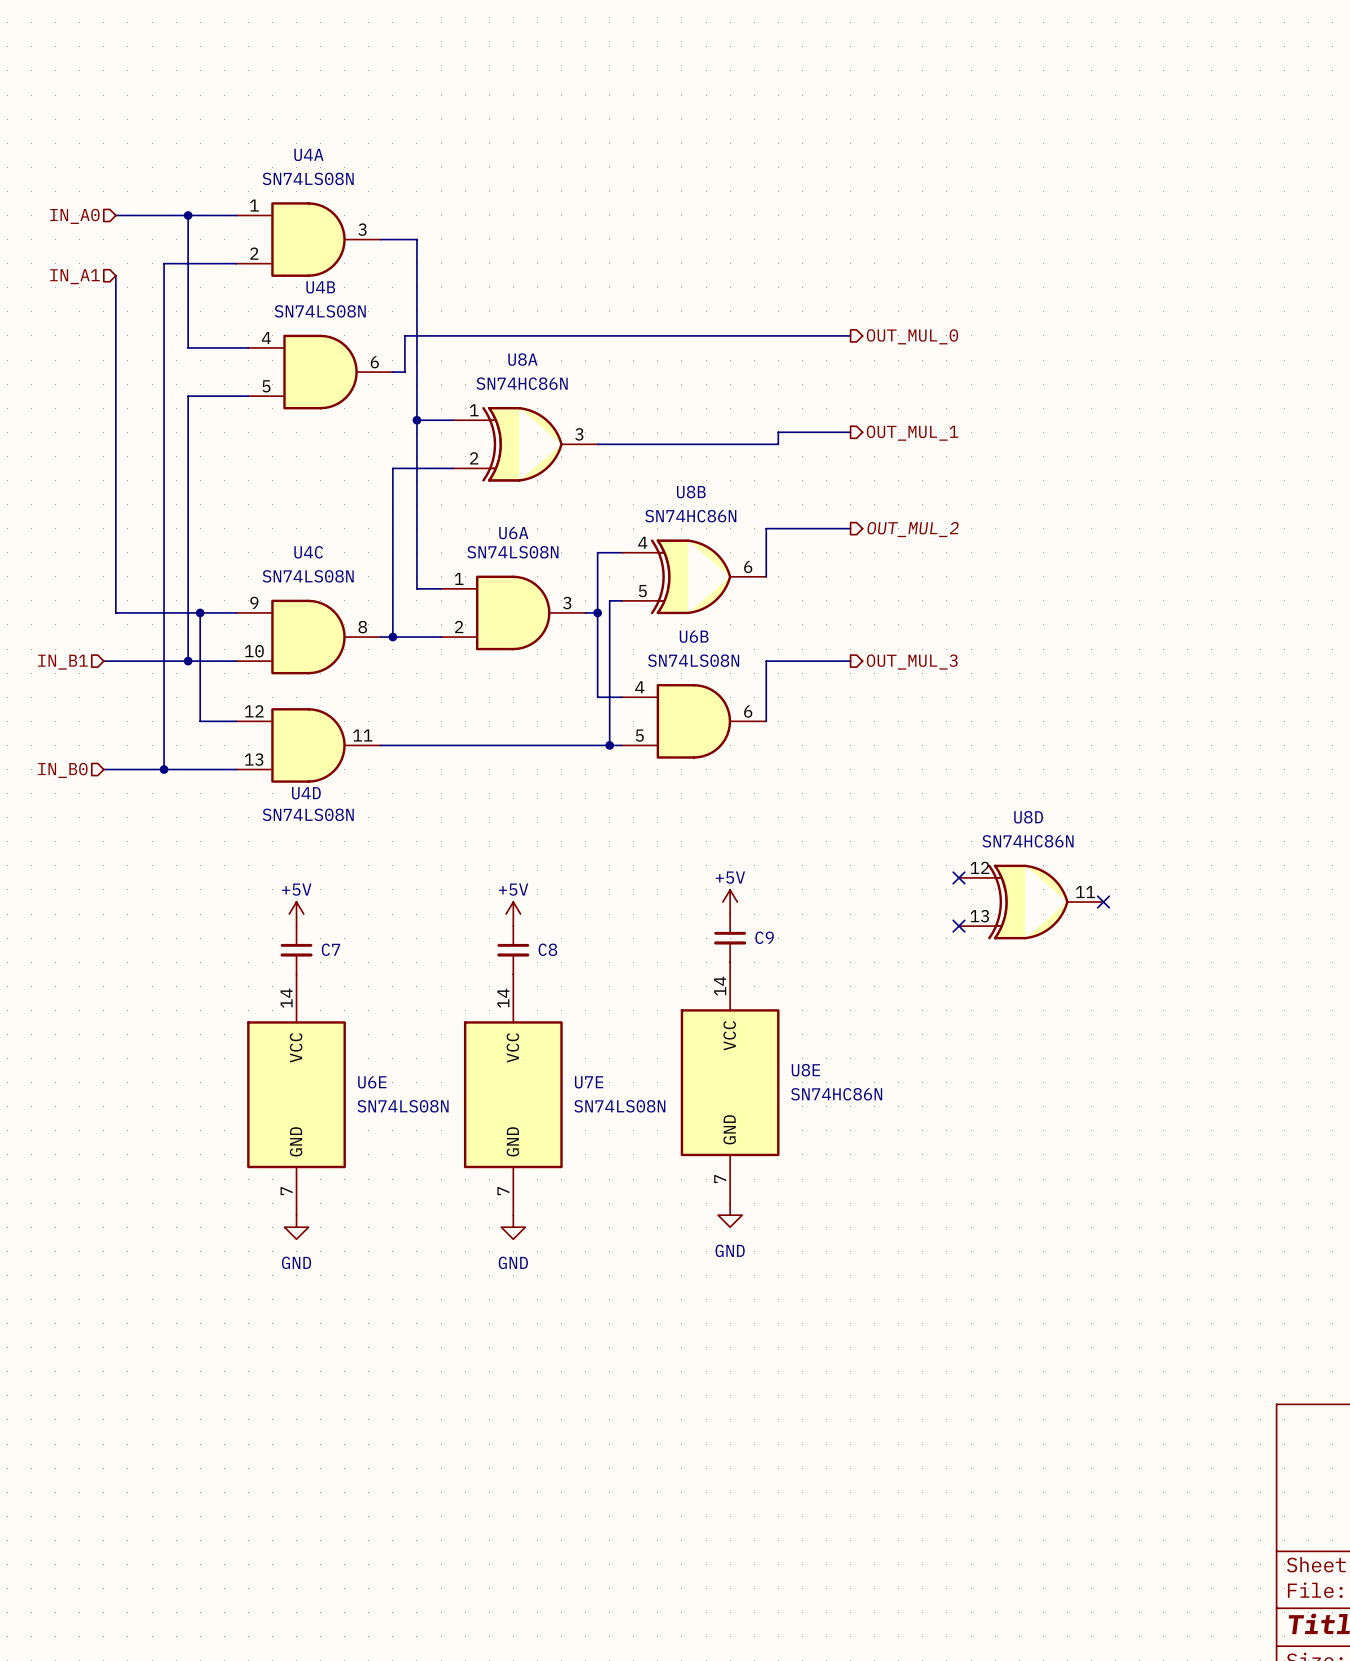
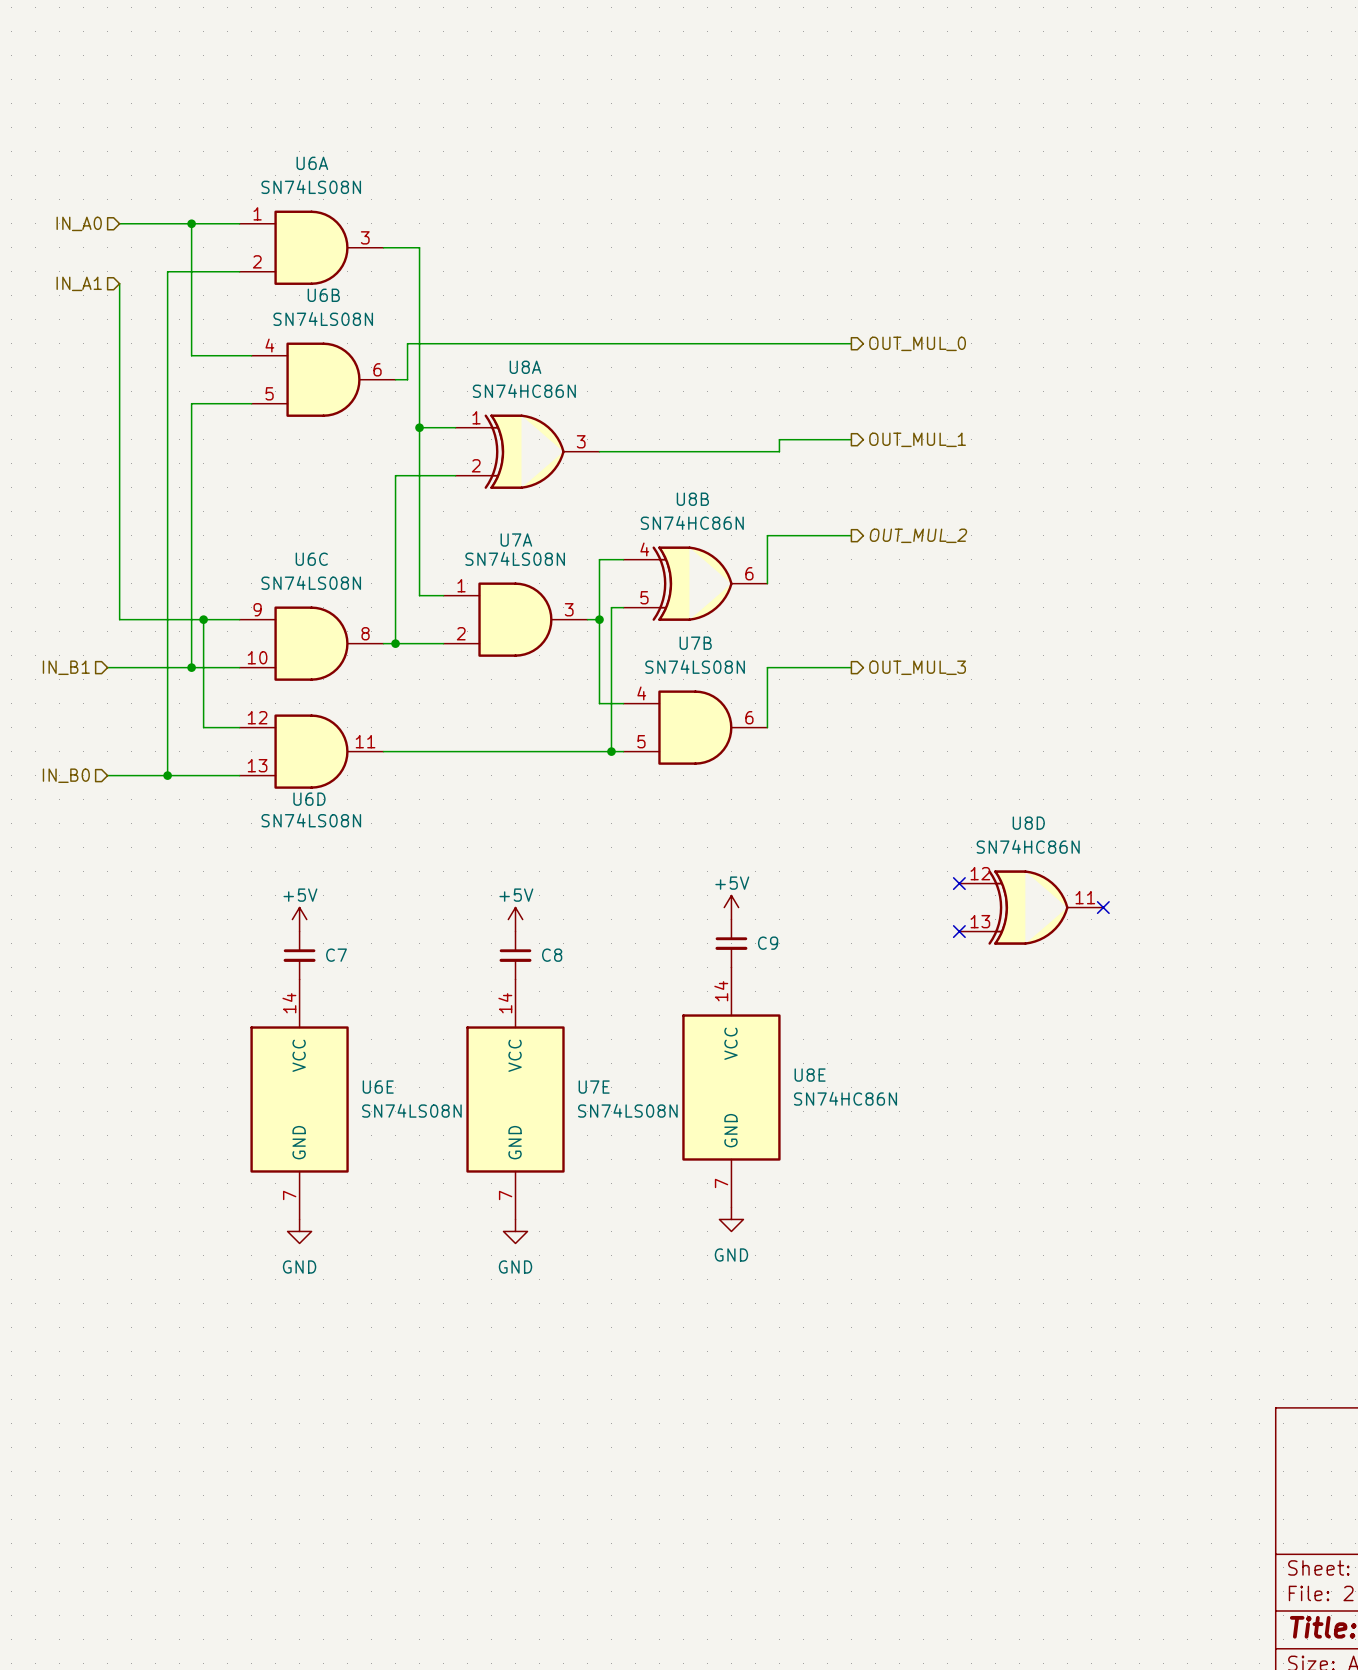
U4A name: U4A (308, 154) -> U6A (312, 163)
U4B name: U4B (320, 287) -> U6B (323, 295)
U6A name: U6A (513, 533) -> U7A (516, 540)
U4C name: U4C (308, 552) -> U6C (311, 559)
U6B name: U6B (694, 636) -> U7B (695, 643)
U4D name: U4D (306, 793) -> U6D (309, 799)

